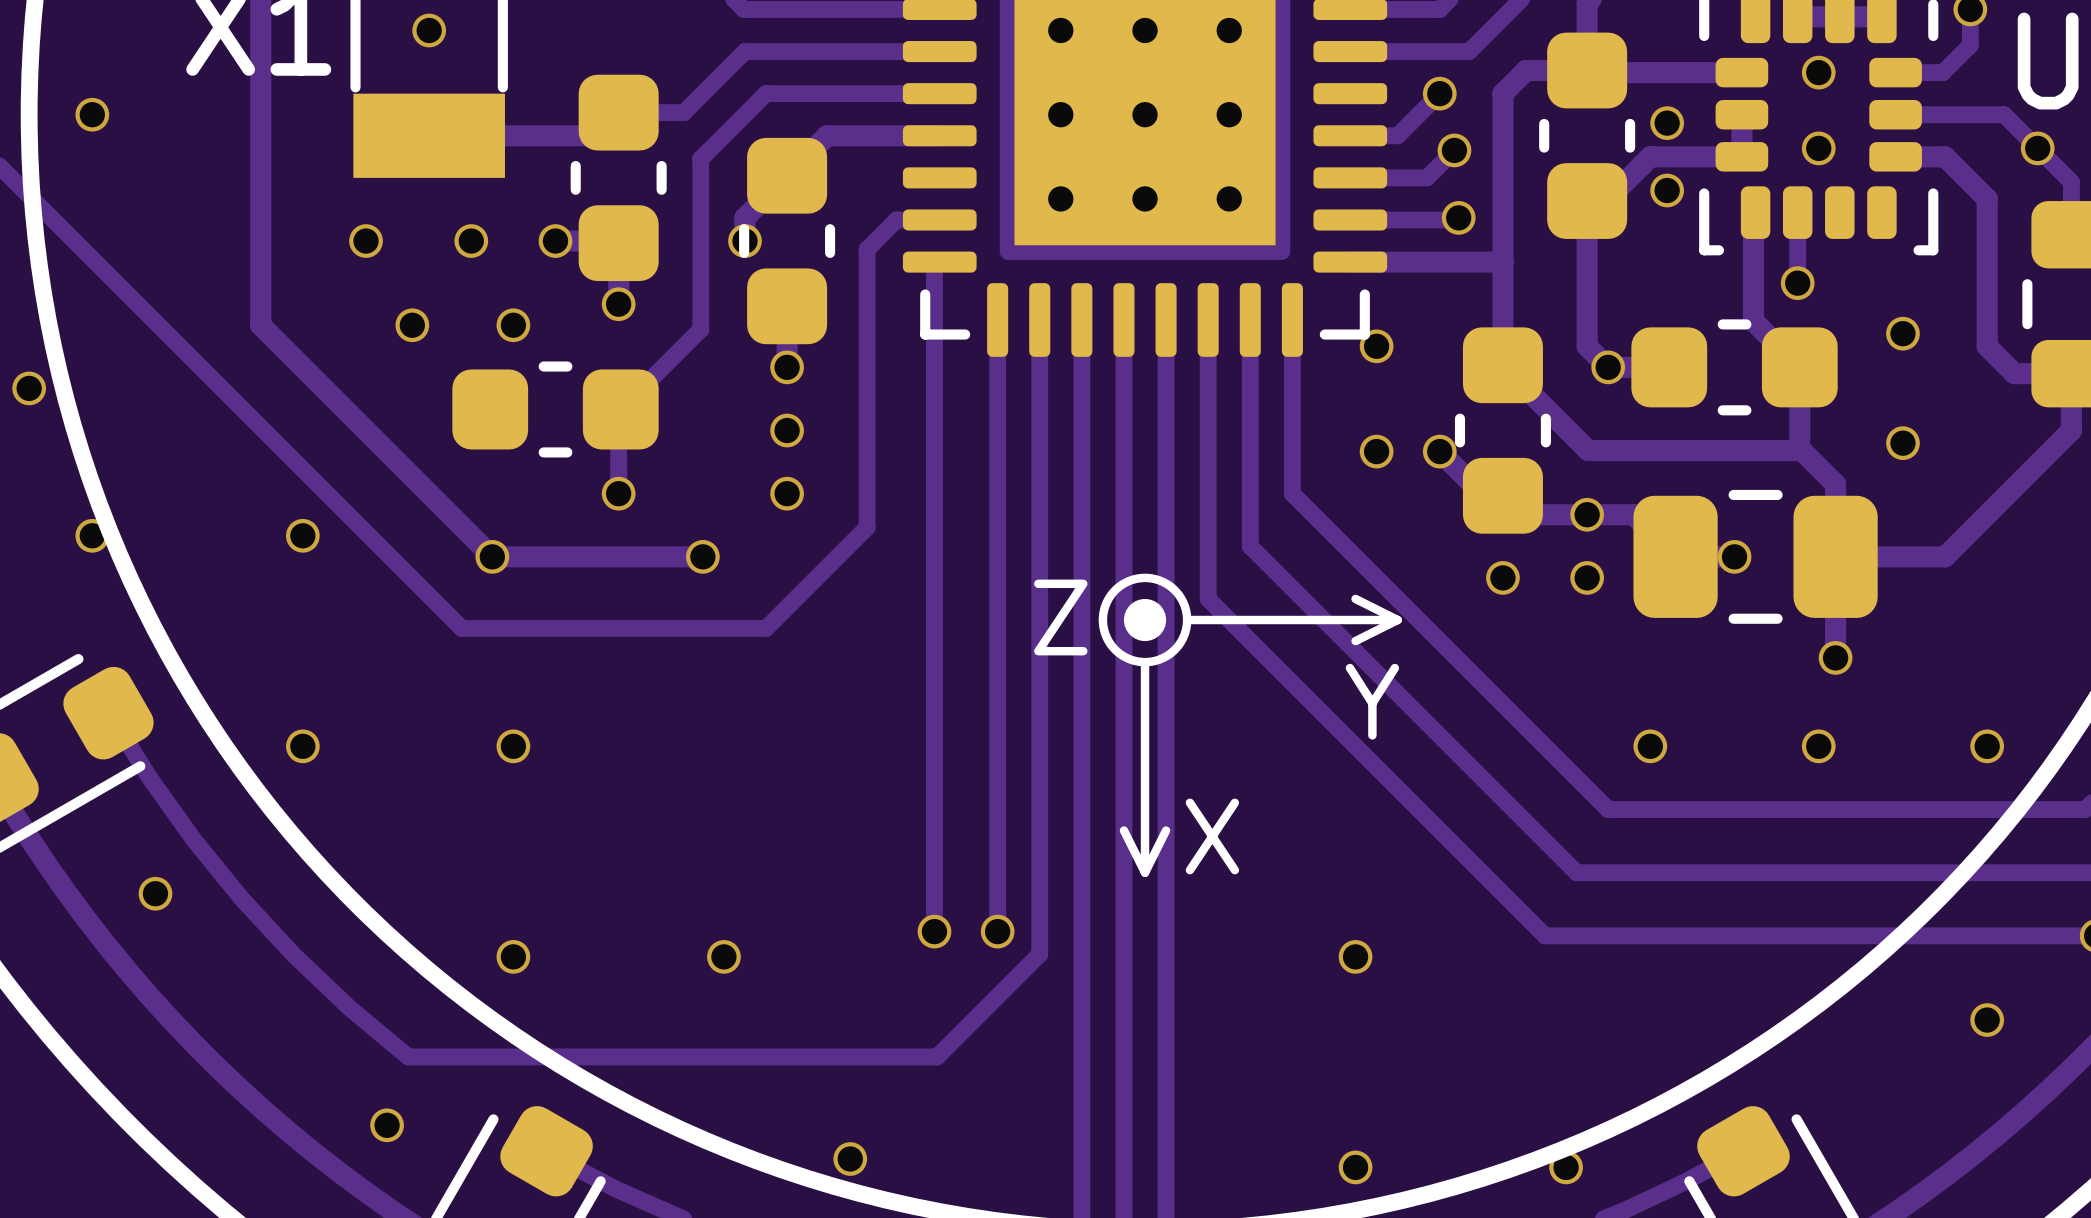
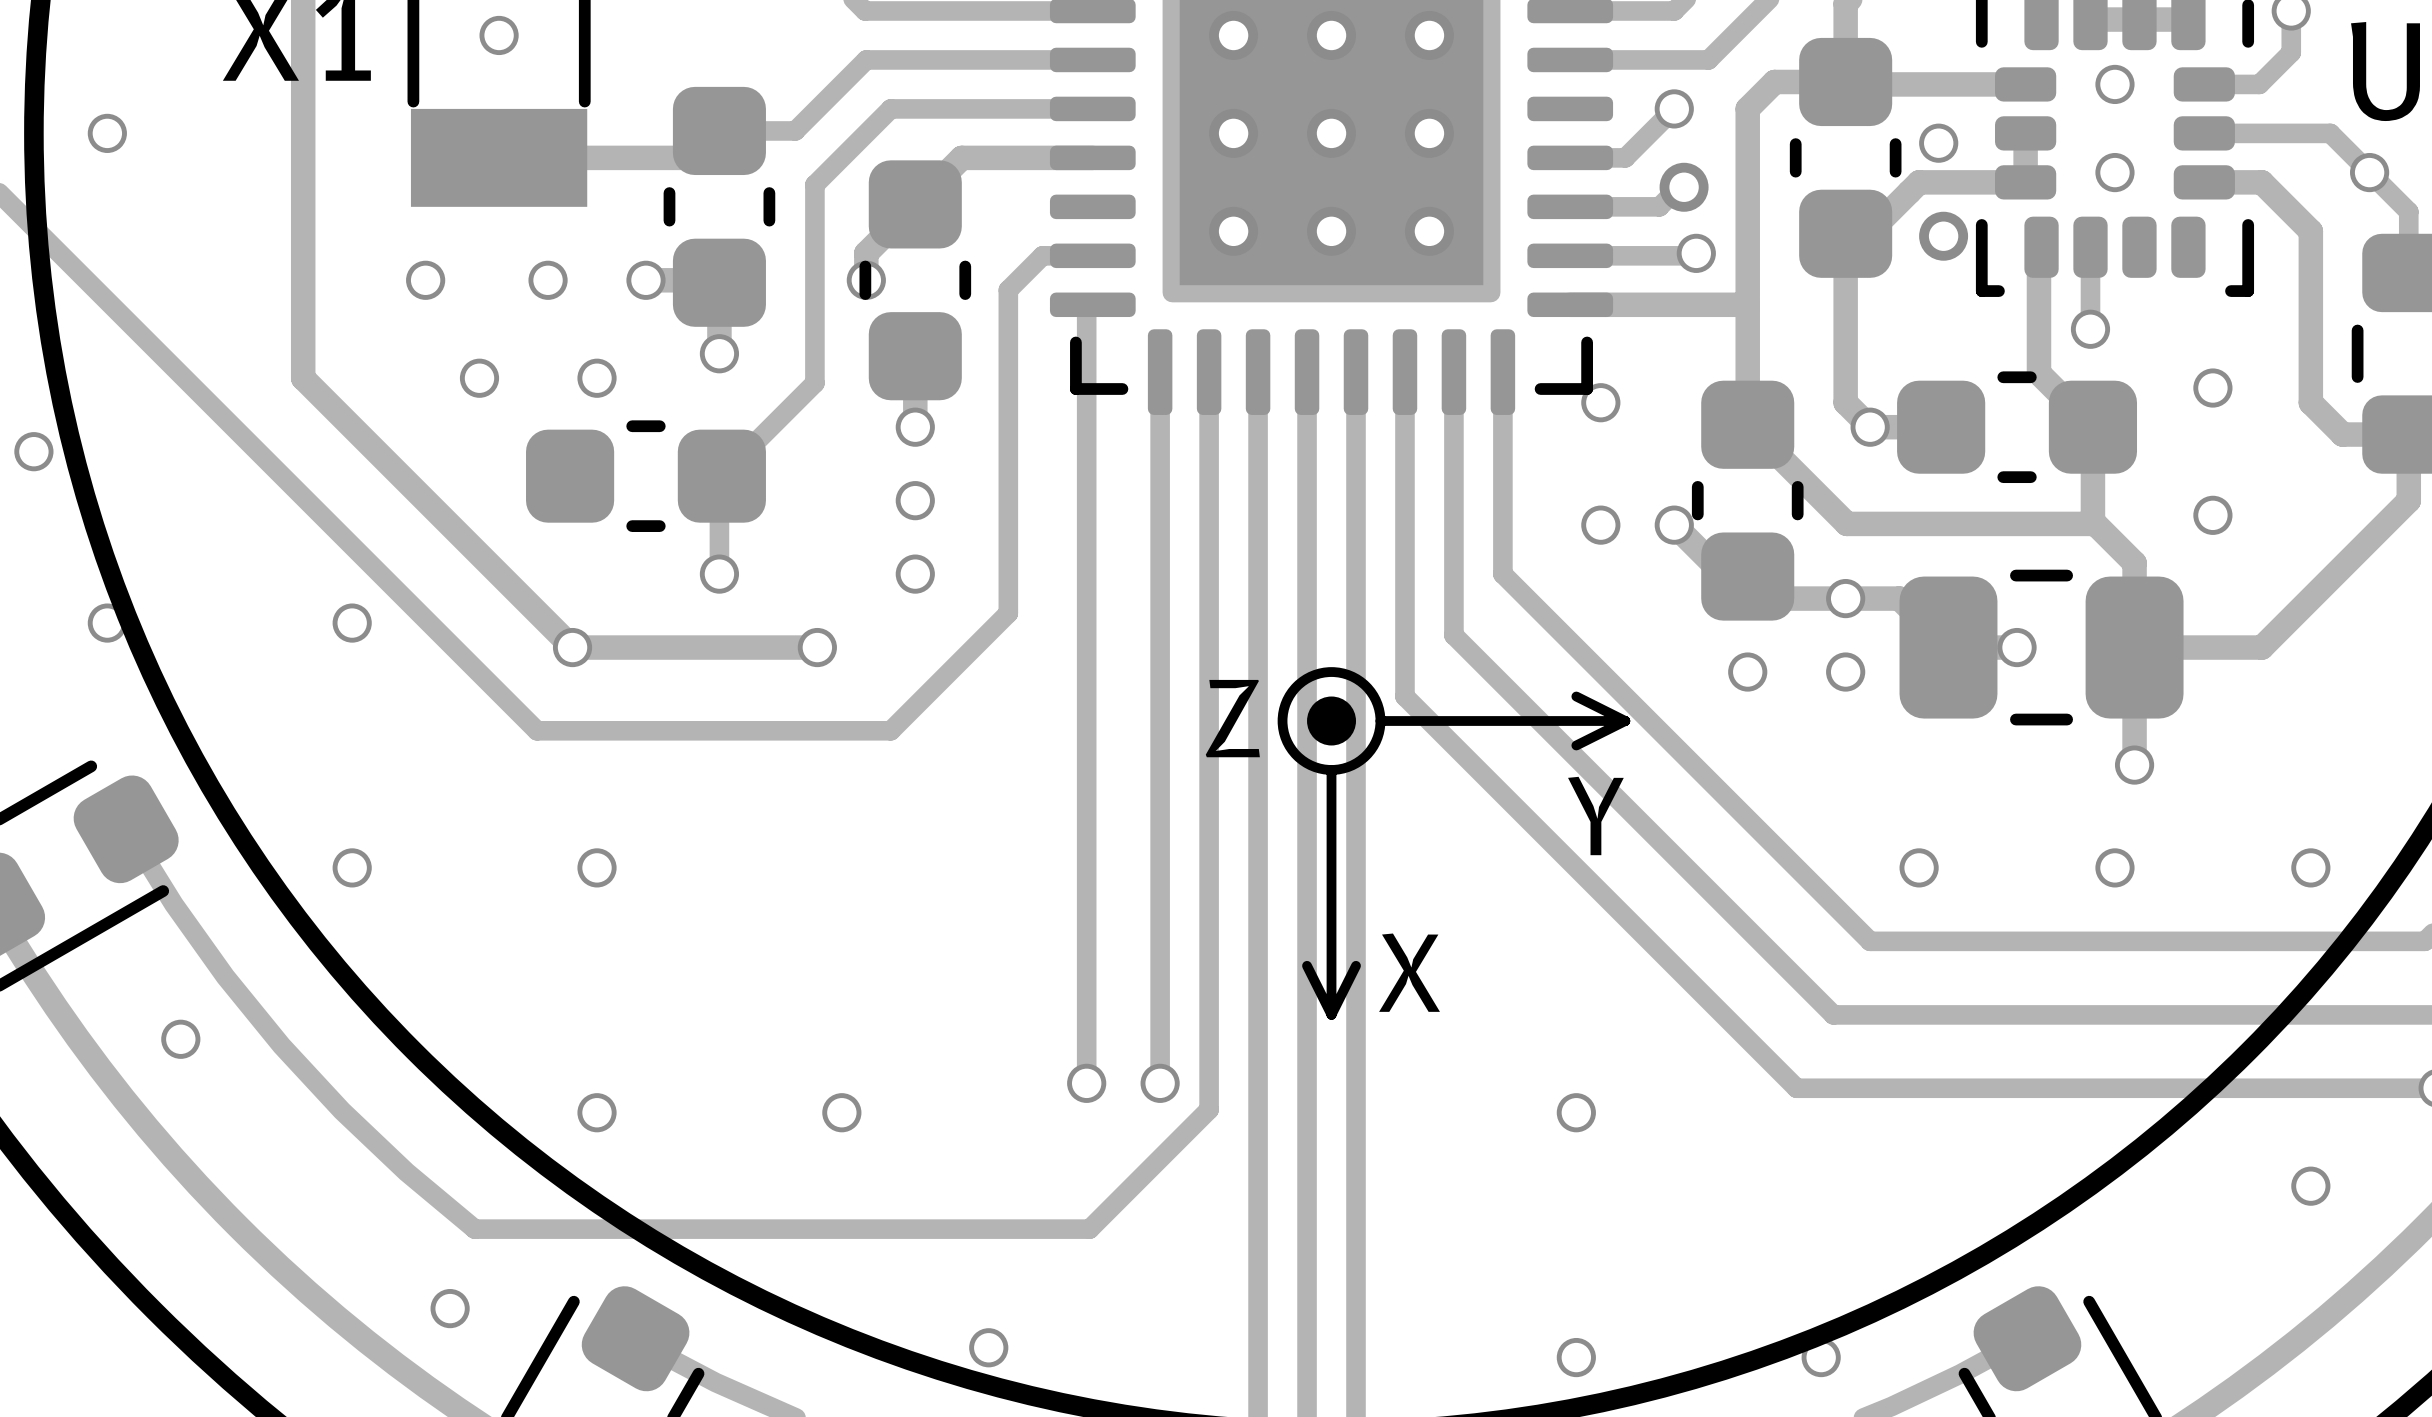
via size: [1437, 133, 1472, 168] -> [1659, 162, 1709, 212]
via size: [1650, 173, 1685, 208] -> [1919, 211, 1969, 261]

